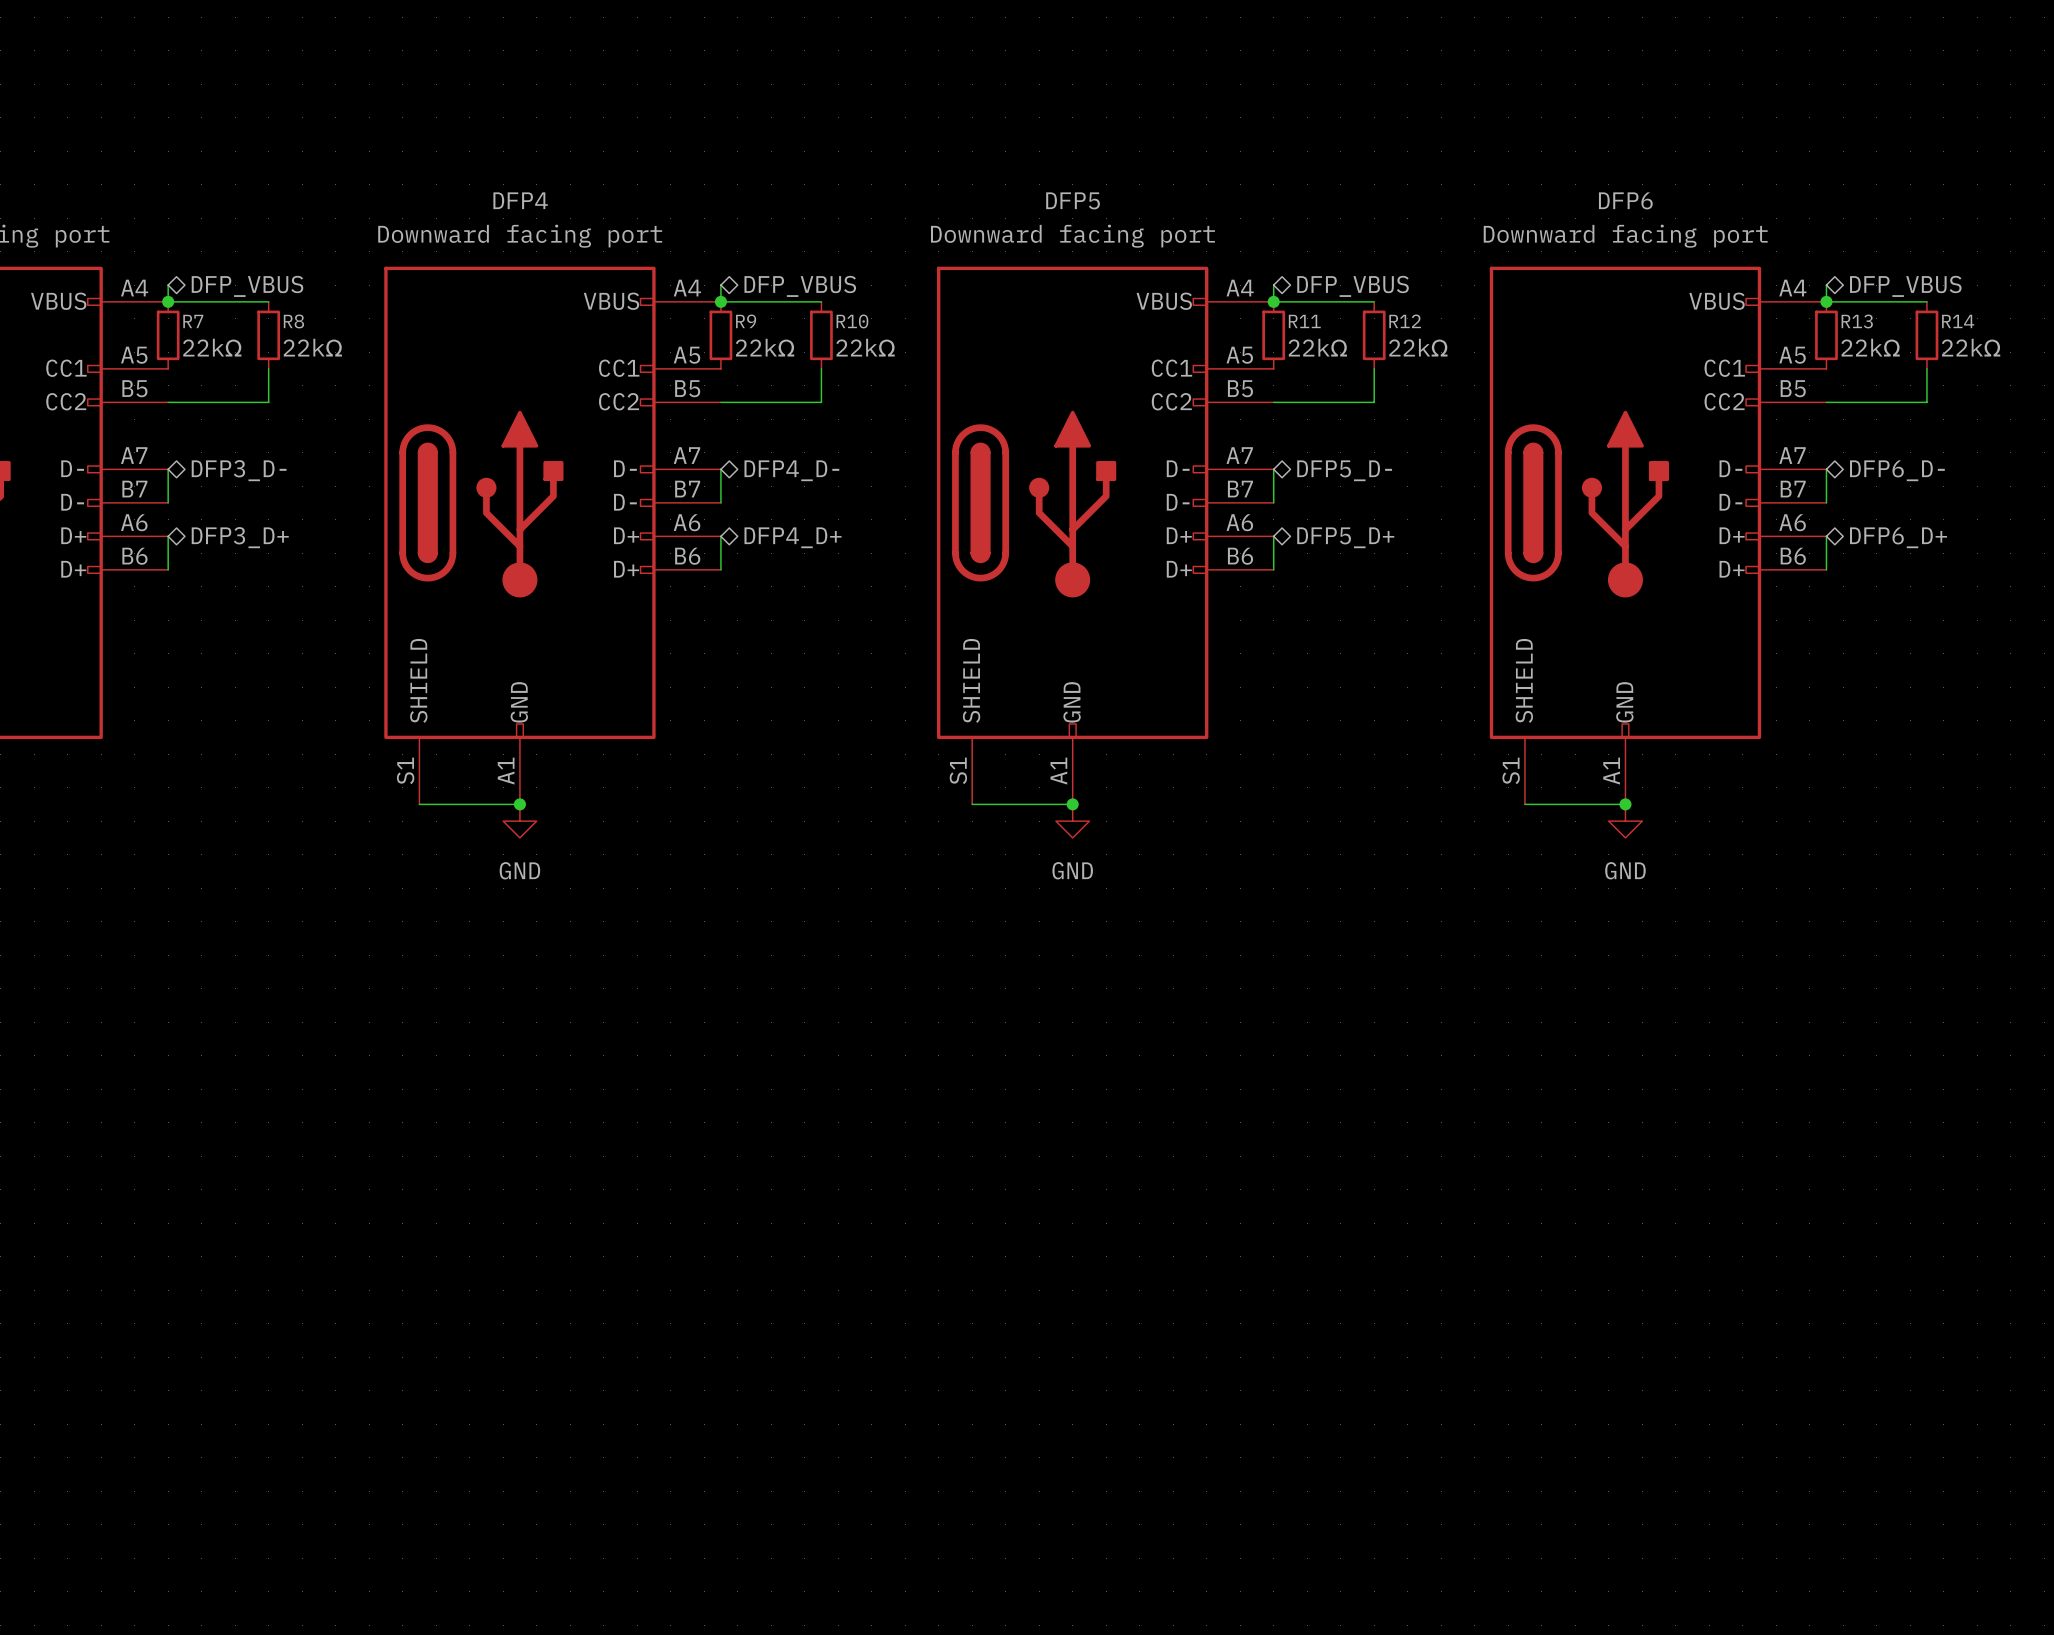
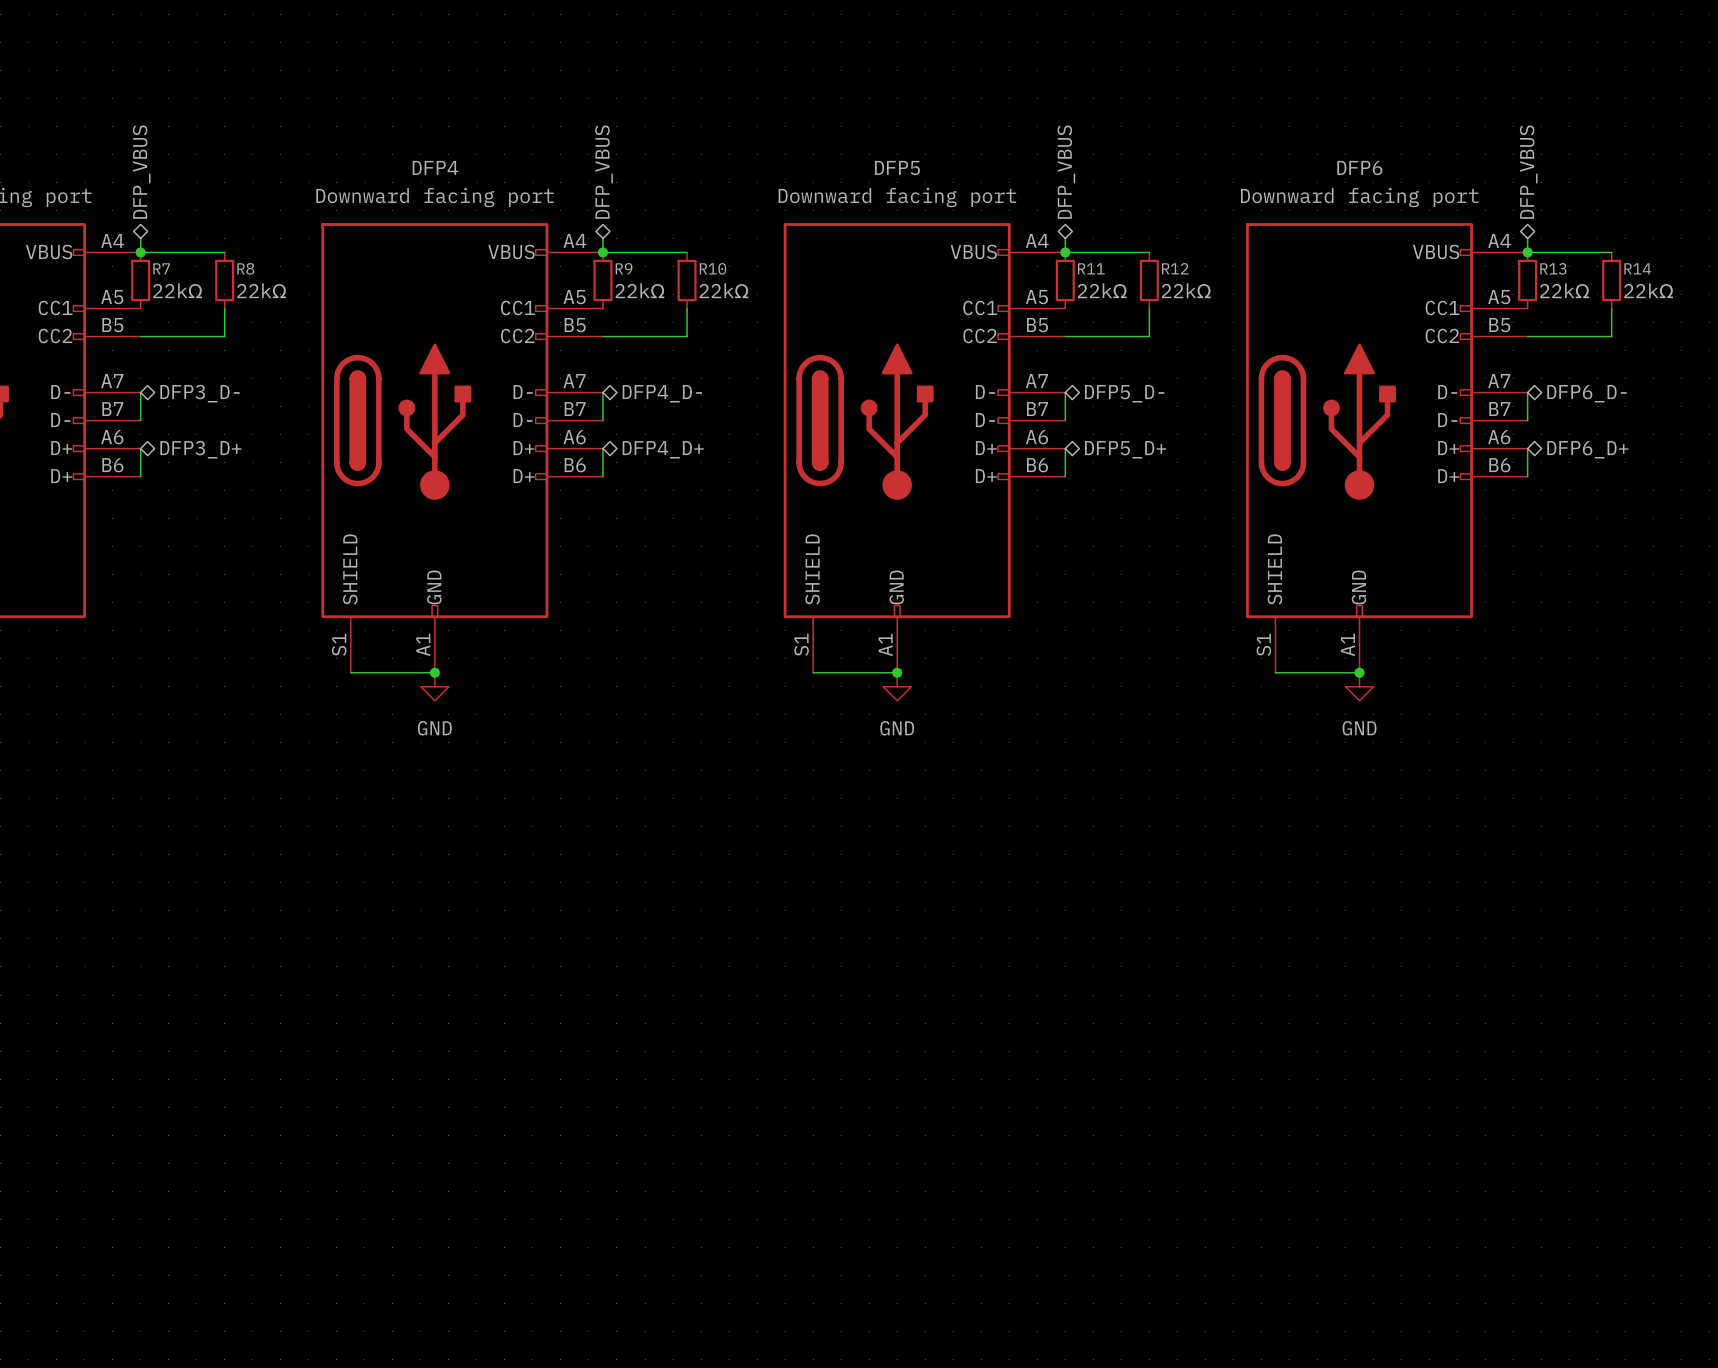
hierarchical label rotation: 0° (247, 286) -> 90° counterclockwise (141, 172)
hierarchical label rotation: 0° (800, 286) -> 90° counterclockwise (604, 172)
hierarchical label rotation: 0° (1353, 286) -> 90° counterclockwise (1066, 172)
hierarchical label rotation: 0° (1905, 286) -> 90° counterclockwise (1528, 172)

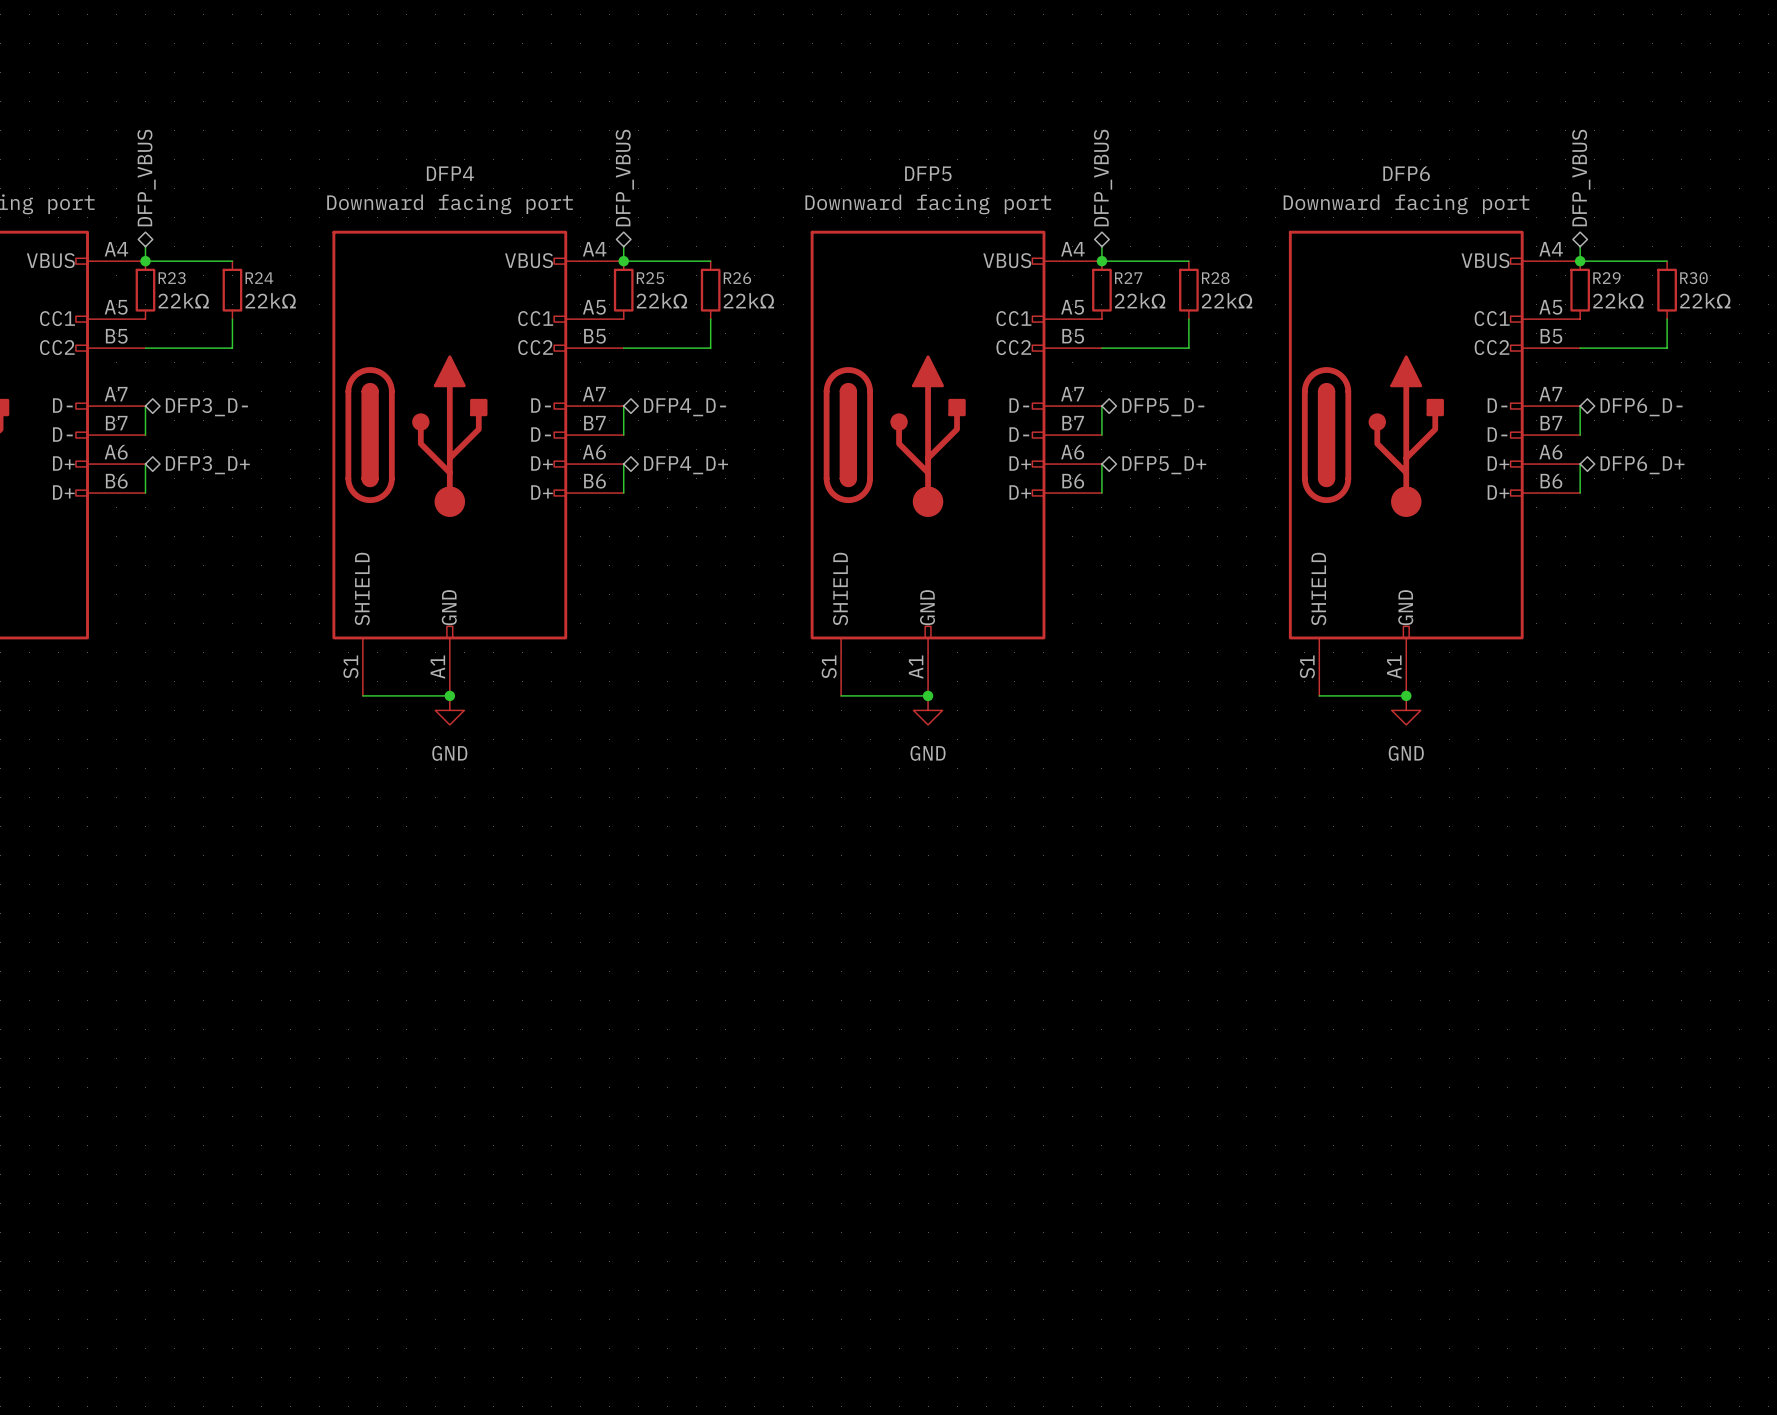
R7 name: R7 (161, 268) -> R23 (172, 278)
R8 name: R8 (245, 268) -> R24 (259, 278)
R9 name: R9 (624, 268) -> R25 (650, 278)
R10 name: R10 (712, 268) -> R26 (737, 278)
R11 name: R11 (1091, 268) -> R27 (1128, 278)
R12 name: R12 (1175, 268) -> R28 (1215, 278)
R13 name: R13 (1553, 268) -> R29 (1606, 278)
R14 name: R14 (1637, 268) -> R30 (1693, 278)

